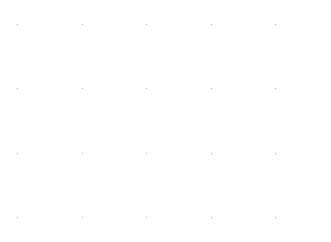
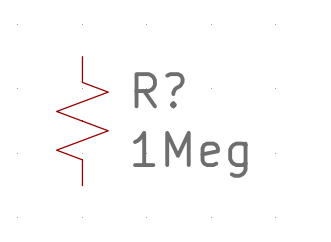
R?: none -> 1Meg (82, 121)

